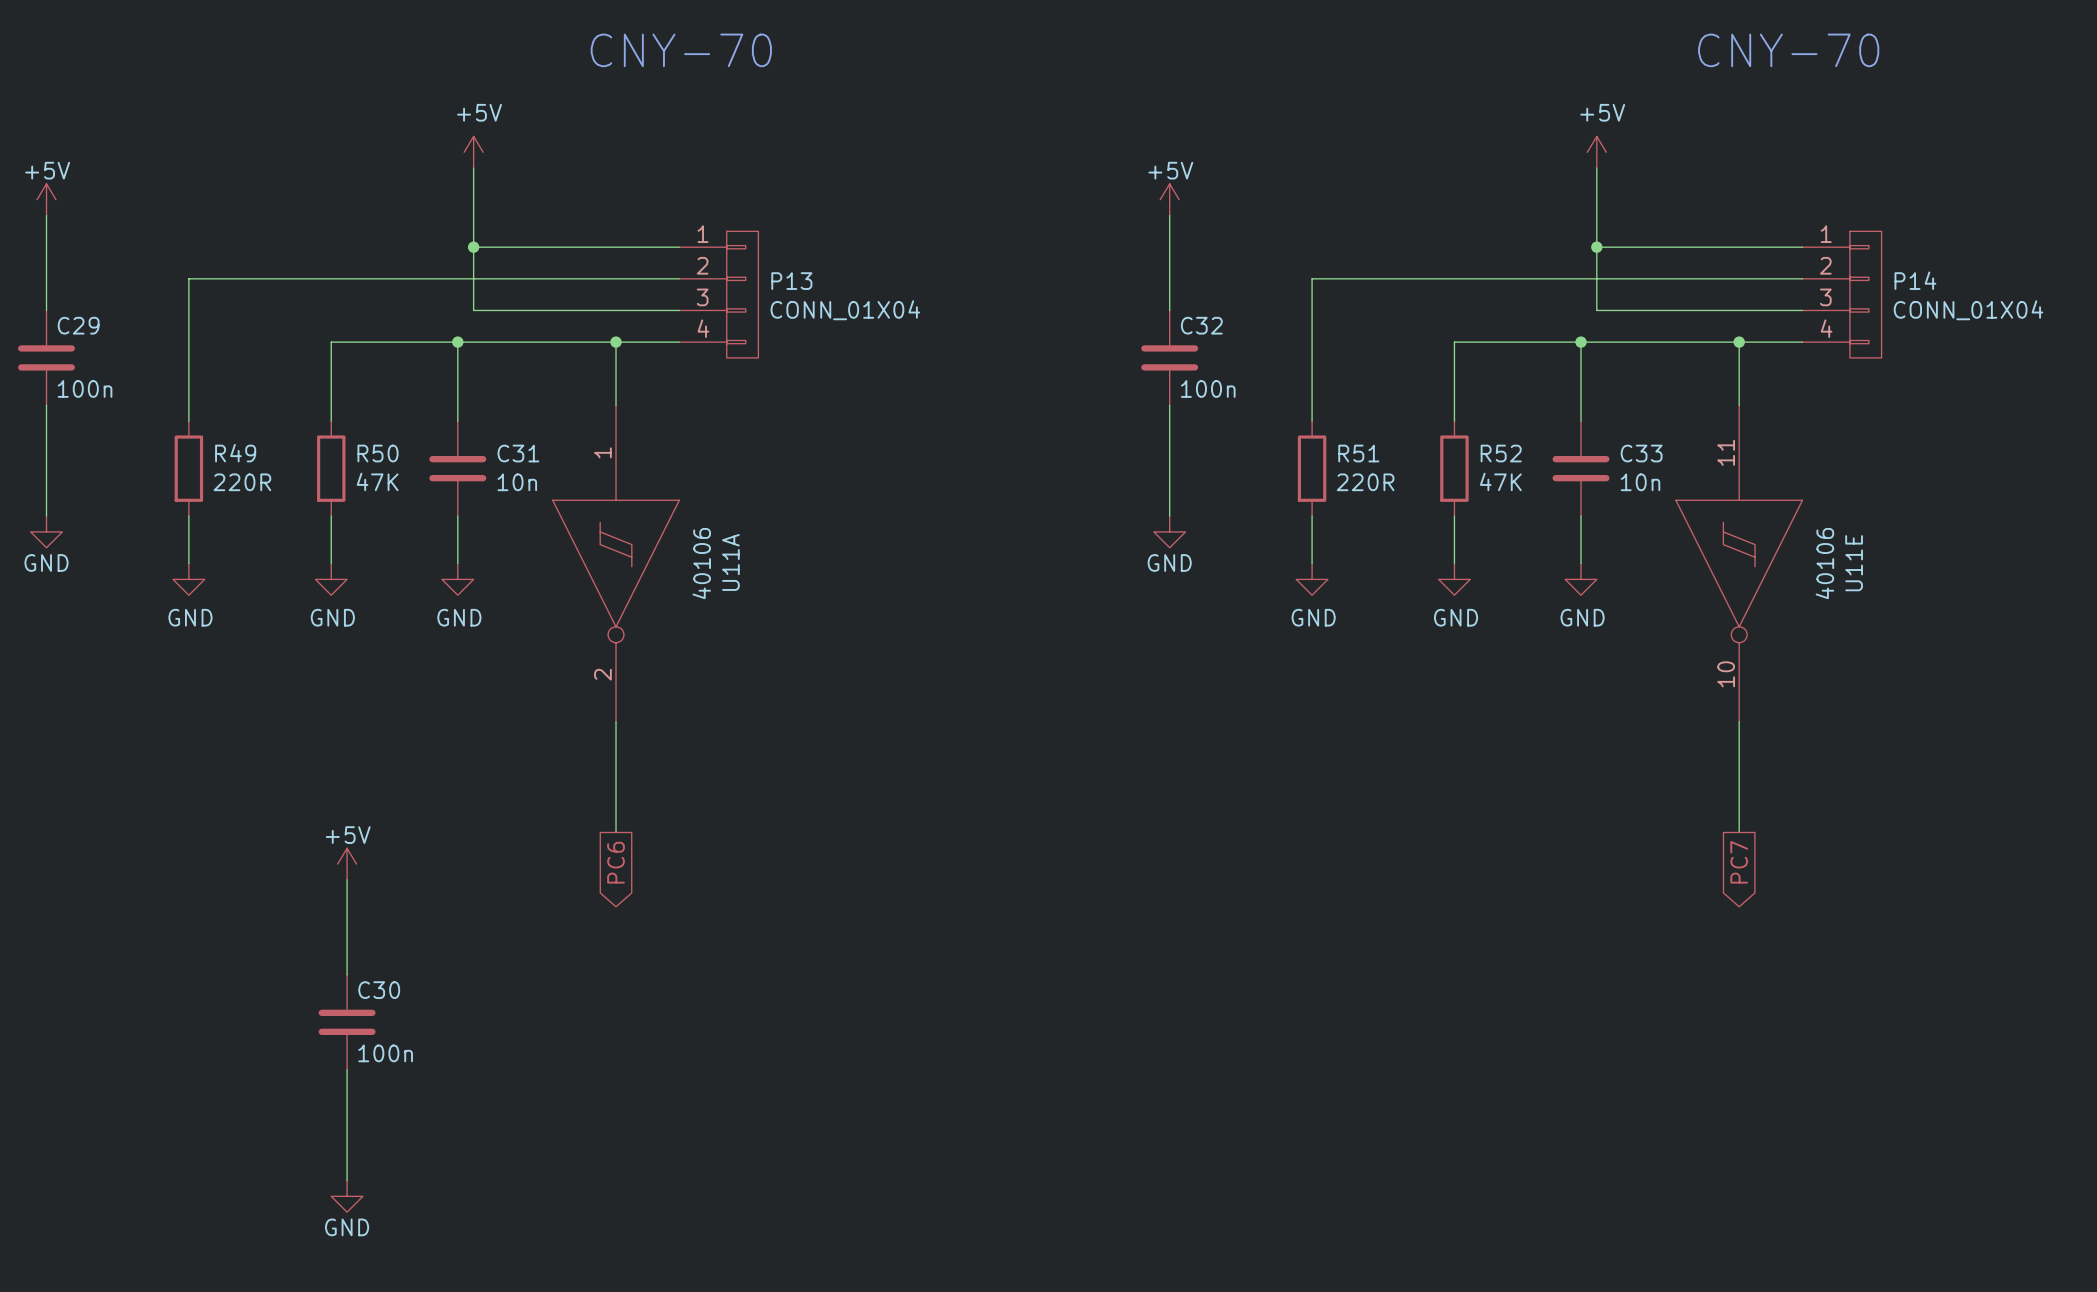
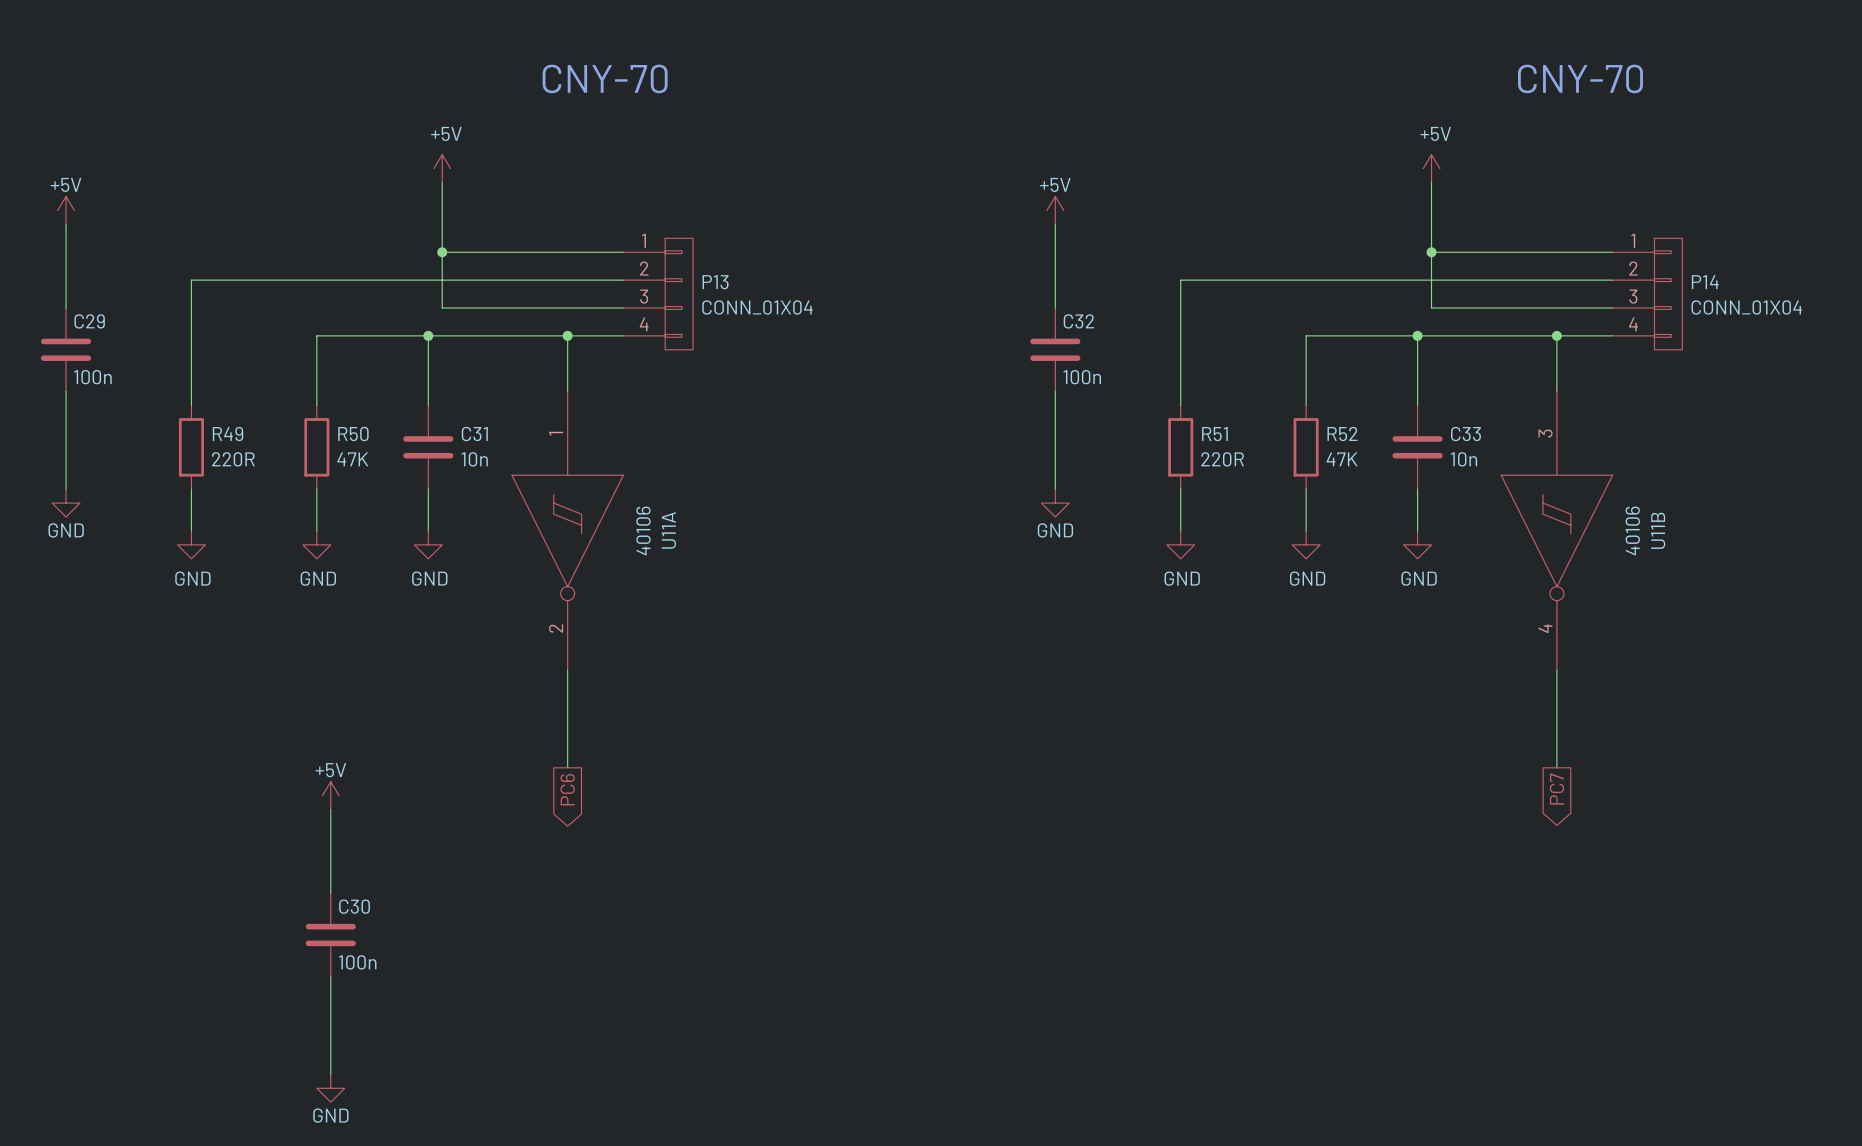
U11E pin number: 11 (1726, 452) -> 3 (1545, 433)
U11E name: U11E (1854, 563) -> U11B (1658, 530)
U11E pin number: 10 (1726, 674) -> 4 (1545, 628)

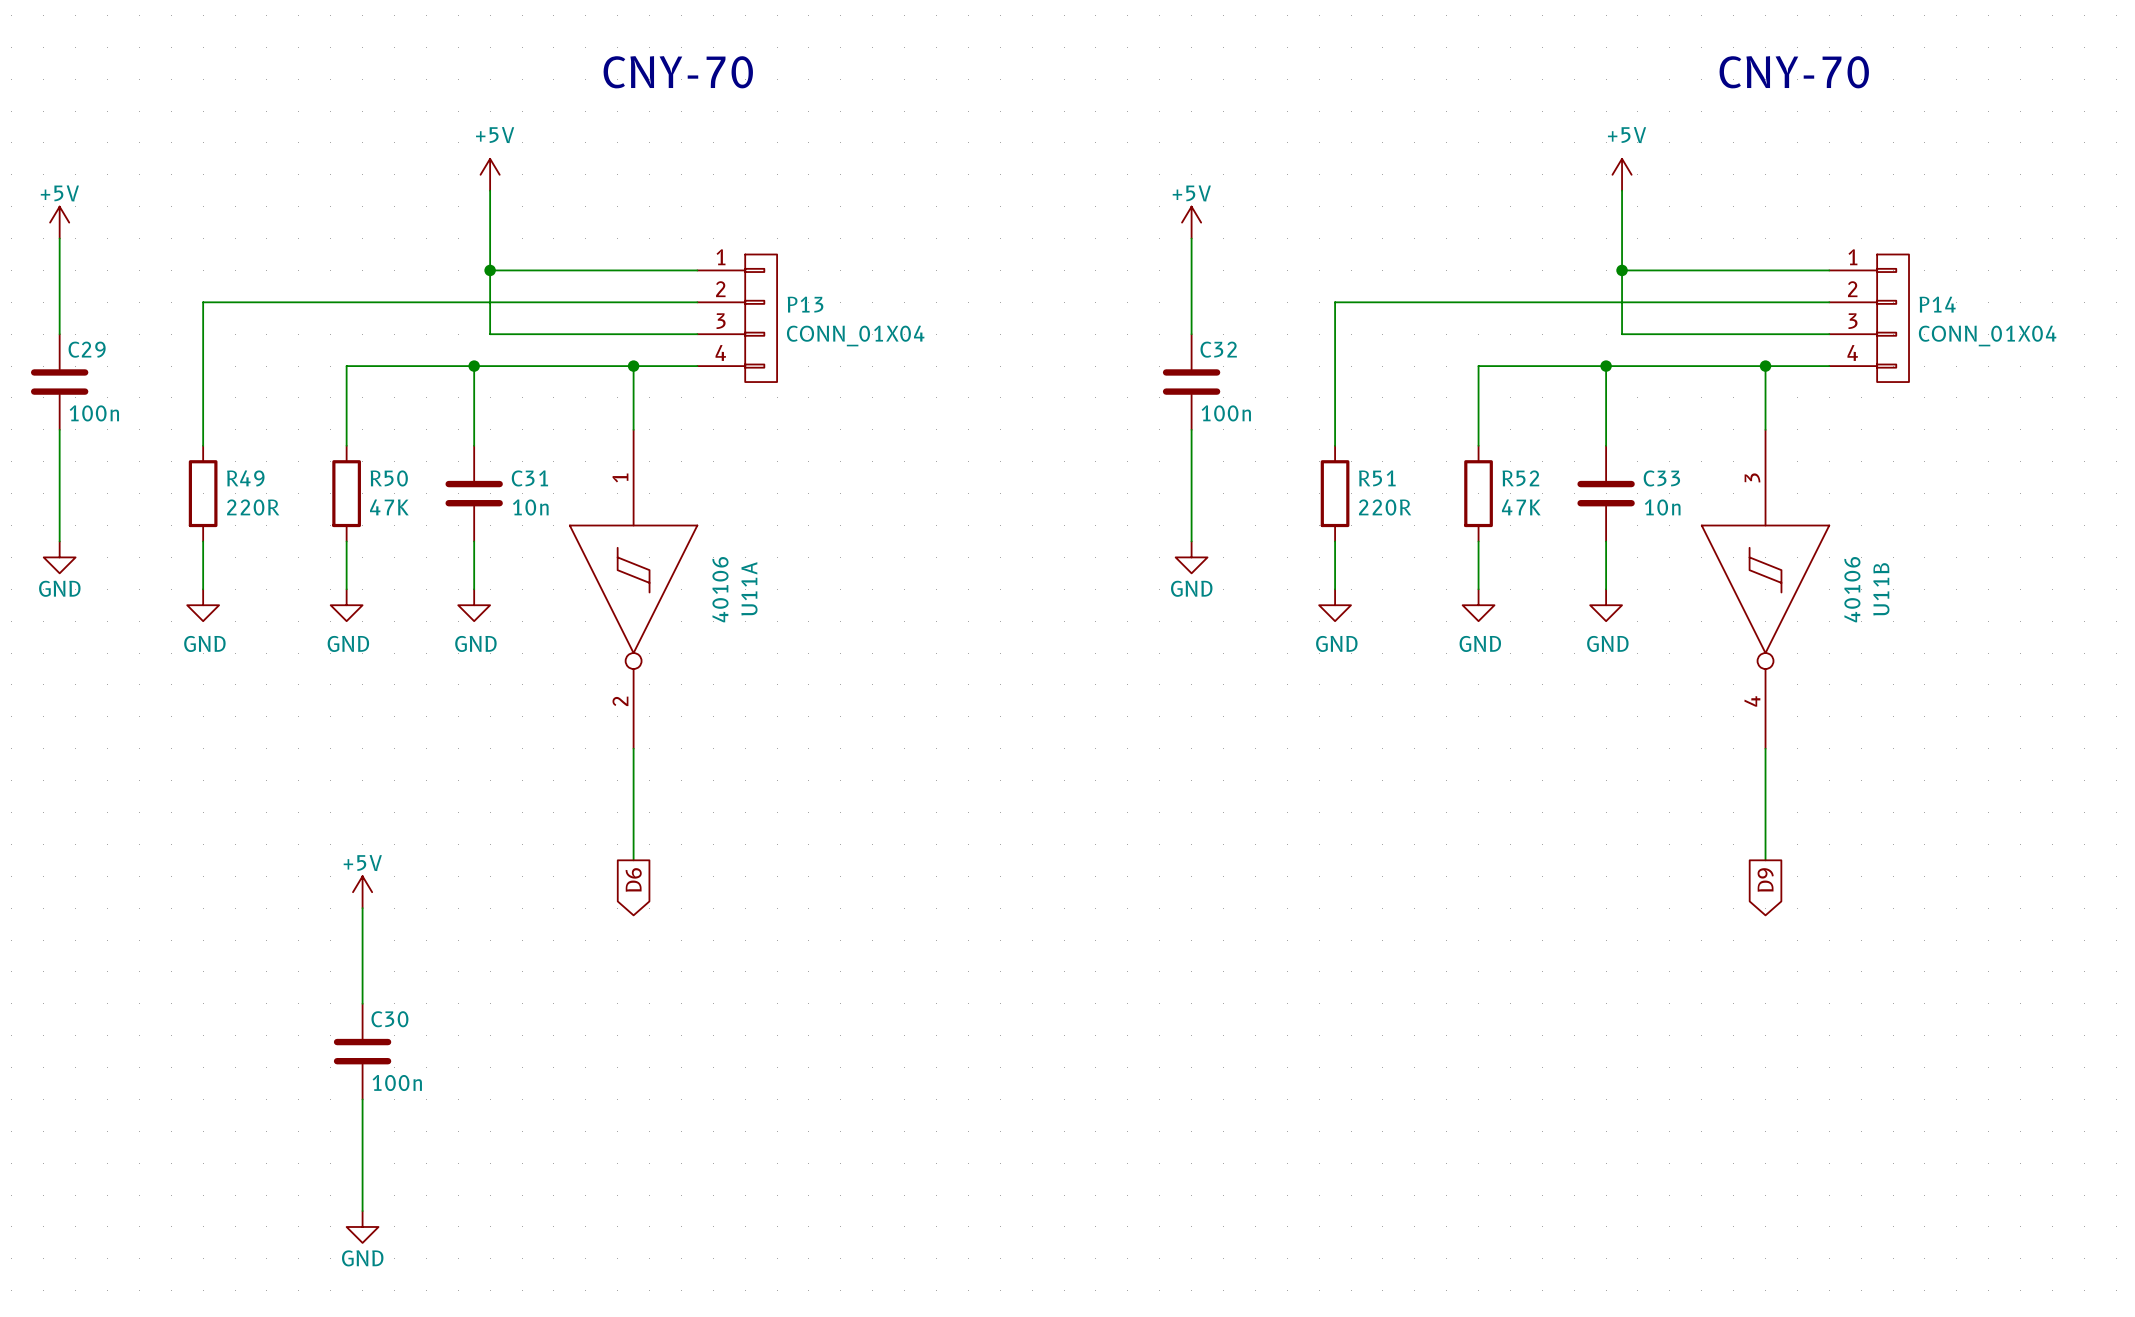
global label: PC6 (567, 789) -> D6 (633, 879)
global label: PC7 (1556, 789) -> D9 (1765, 879)

